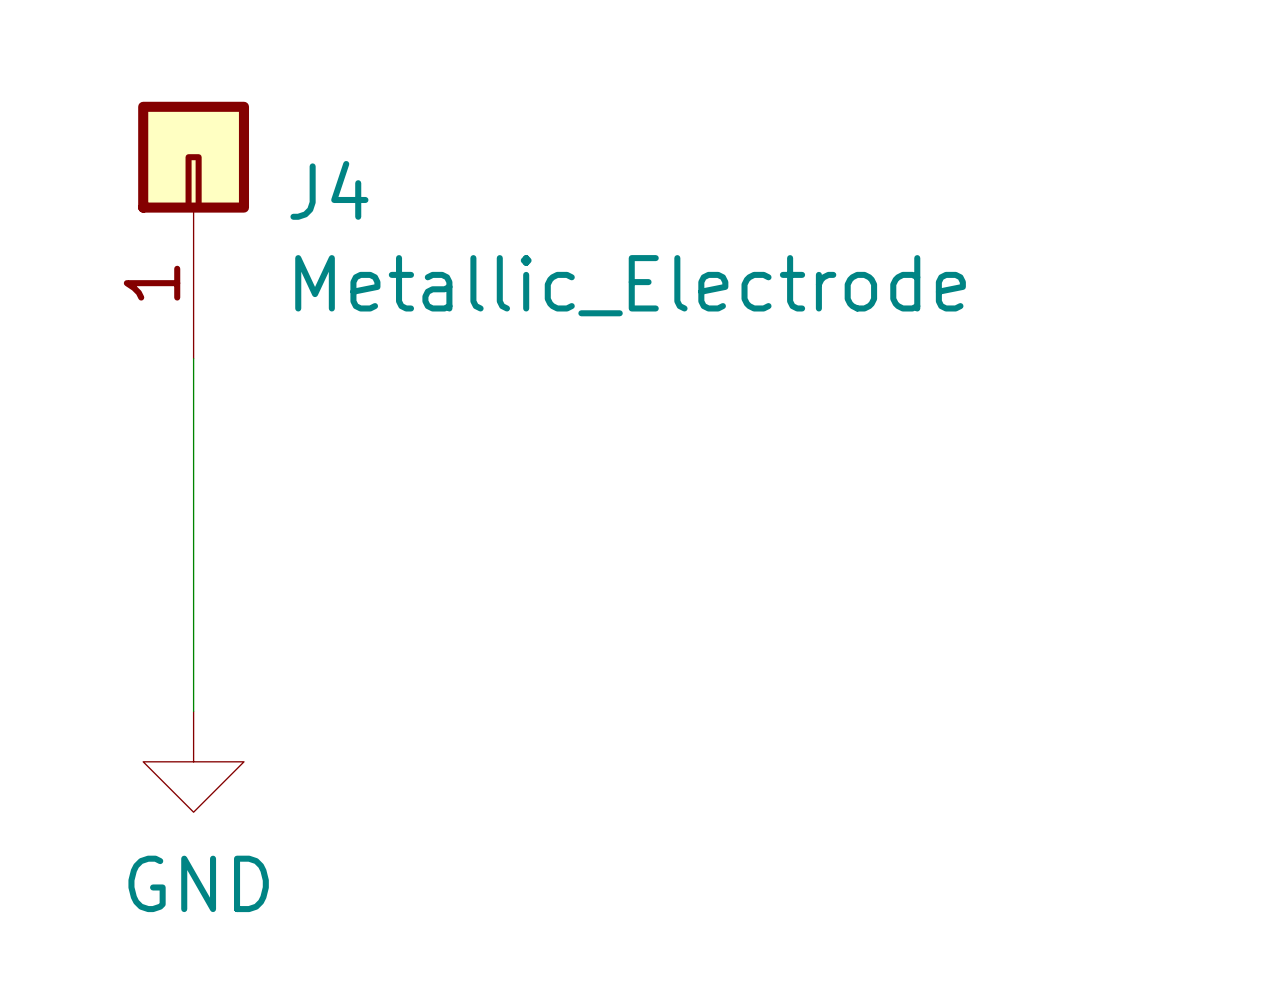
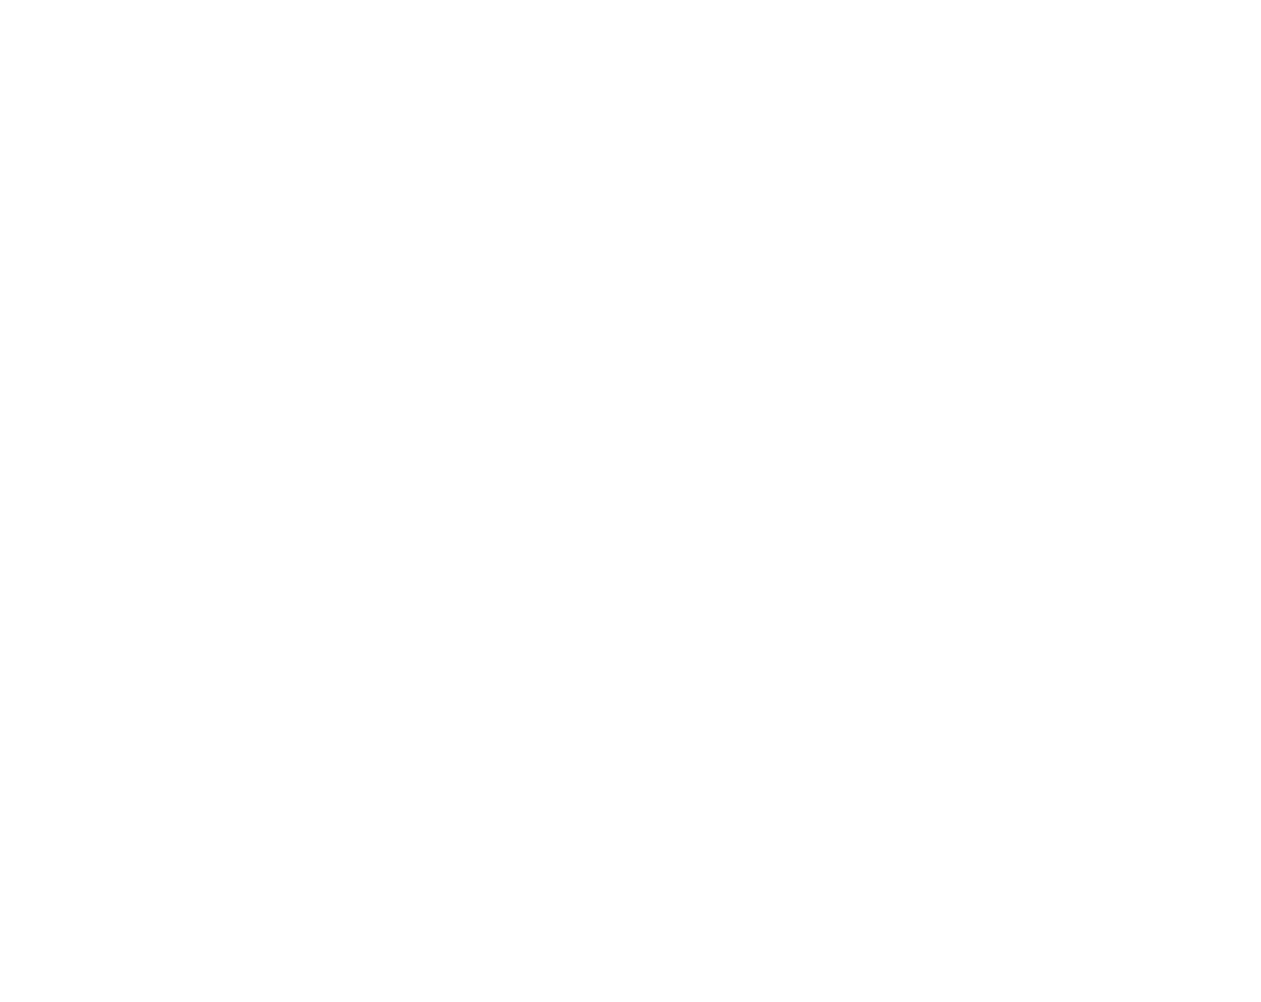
J4: Metallic_Electrode (193, 230) -> none
wire: (193, 358) (193, 711) -> none
power symbol: GND (193, 761) -> none

